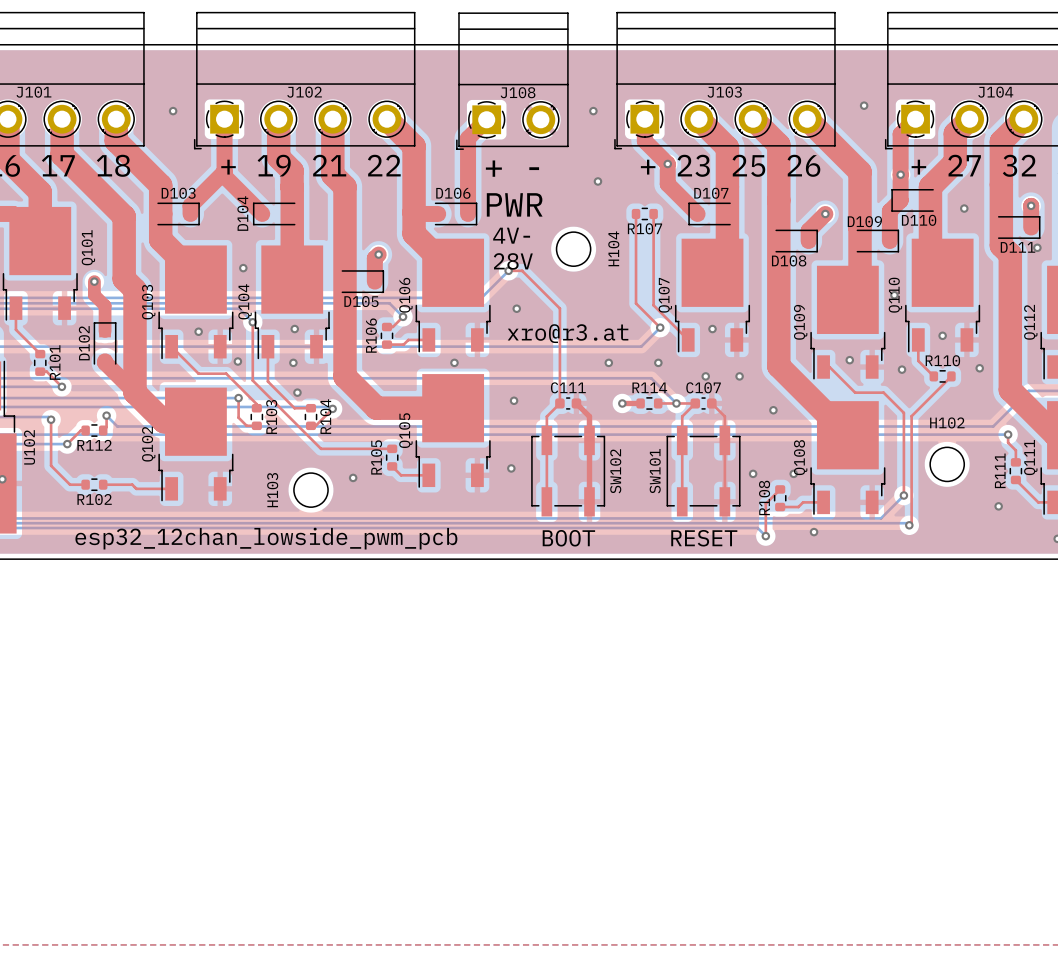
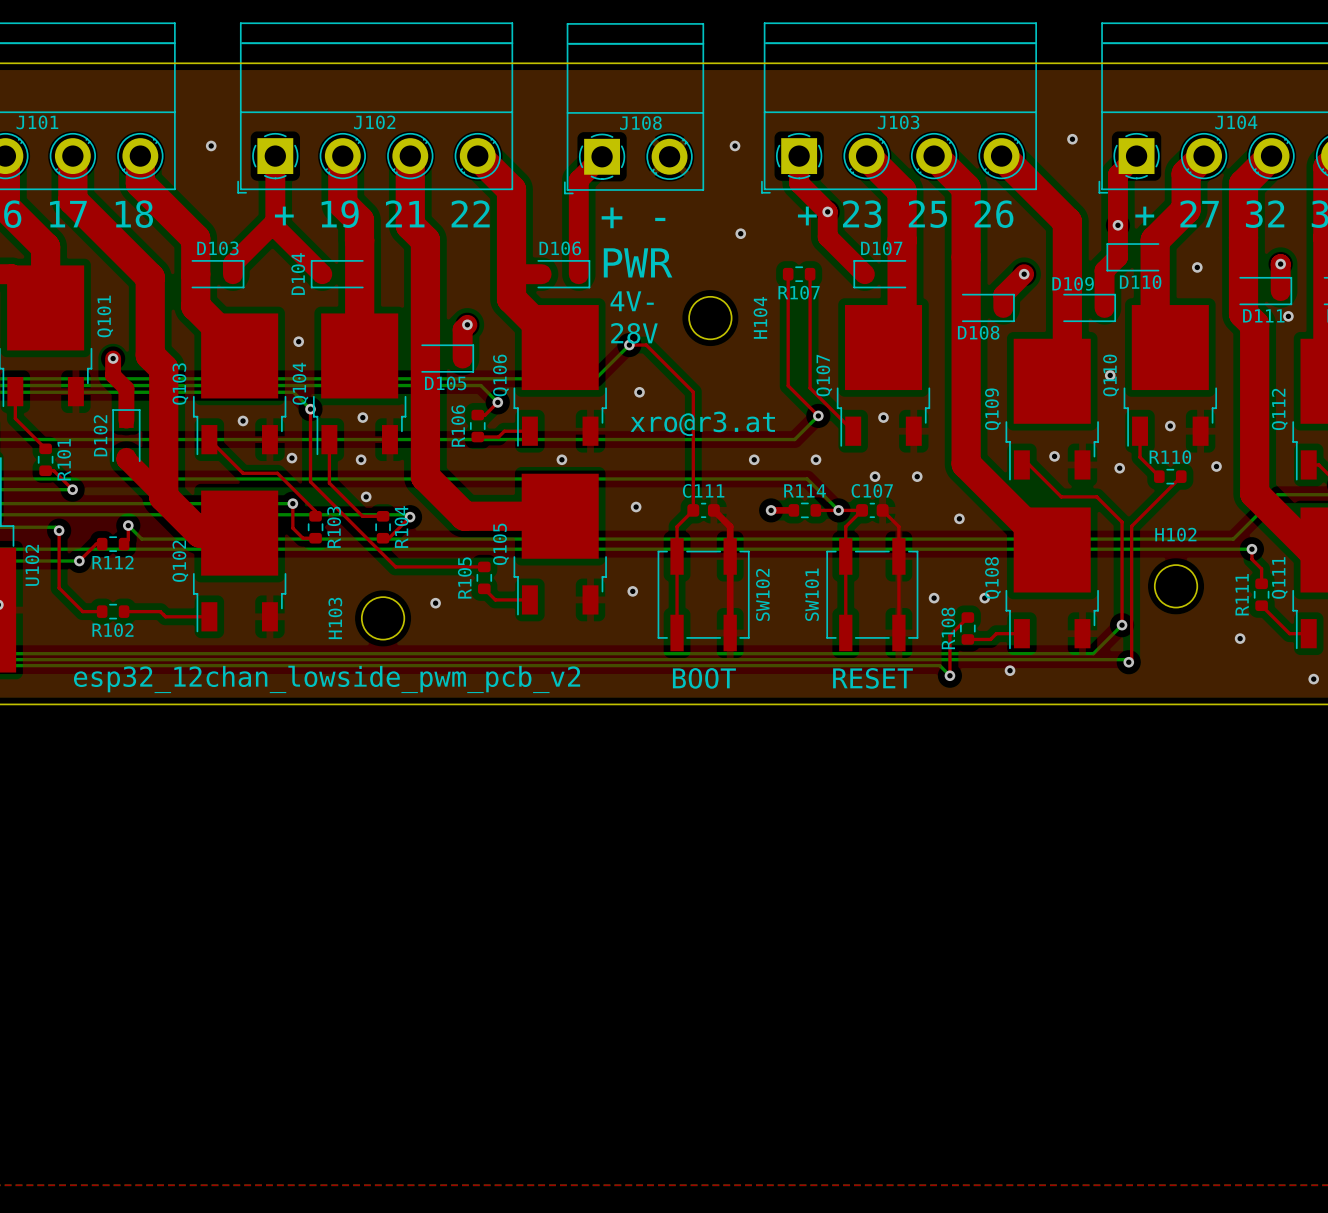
text: esp32_12chan_lowside_pwm_pcb (266, 538) -> esp32_12chan_lowside_pwm_pcb_v2 (327, 679)

